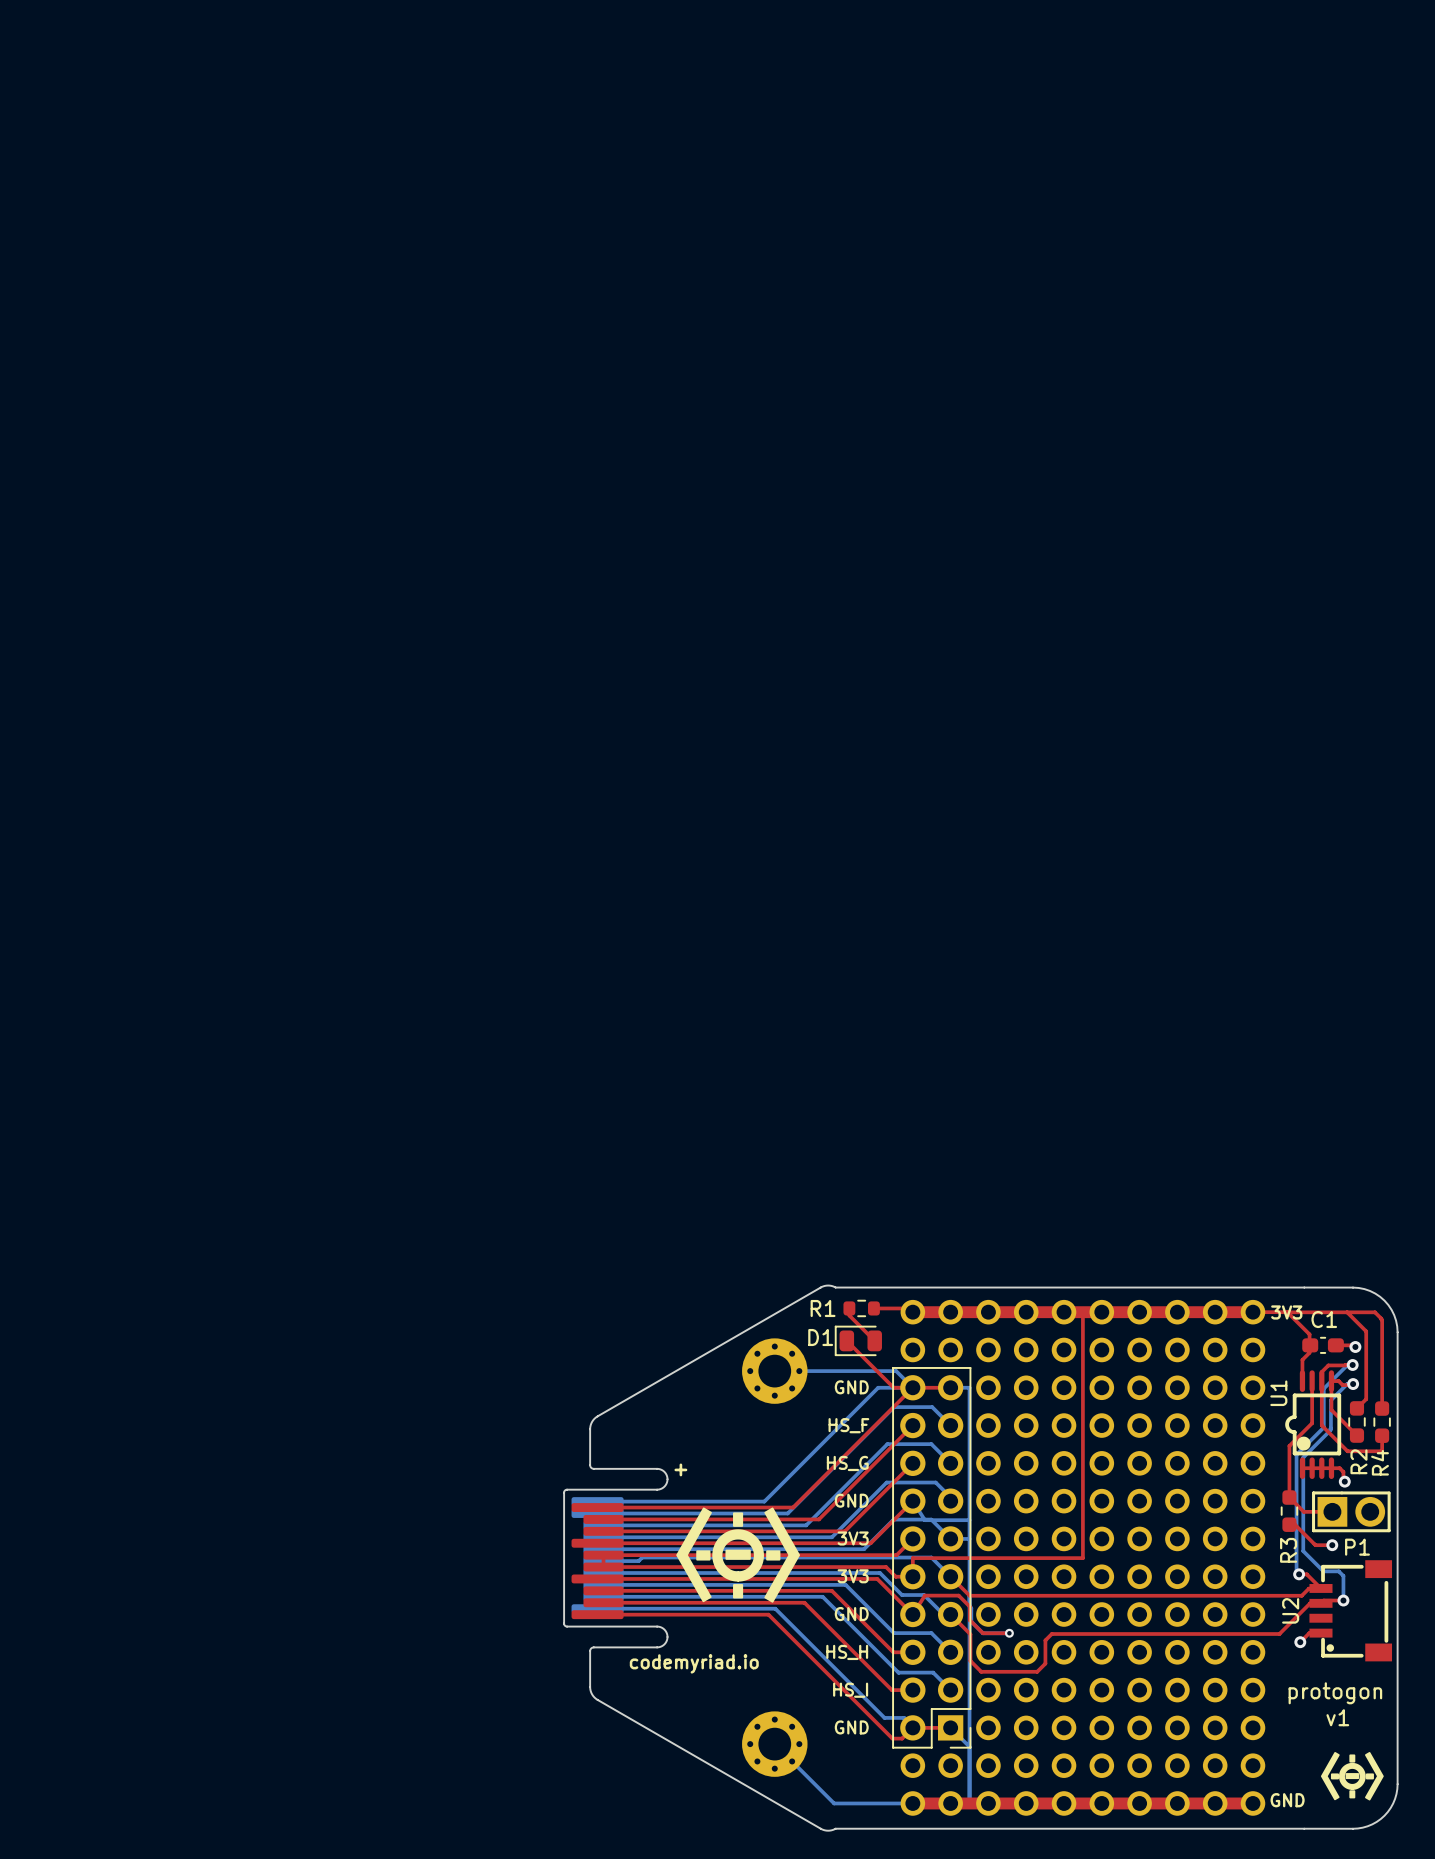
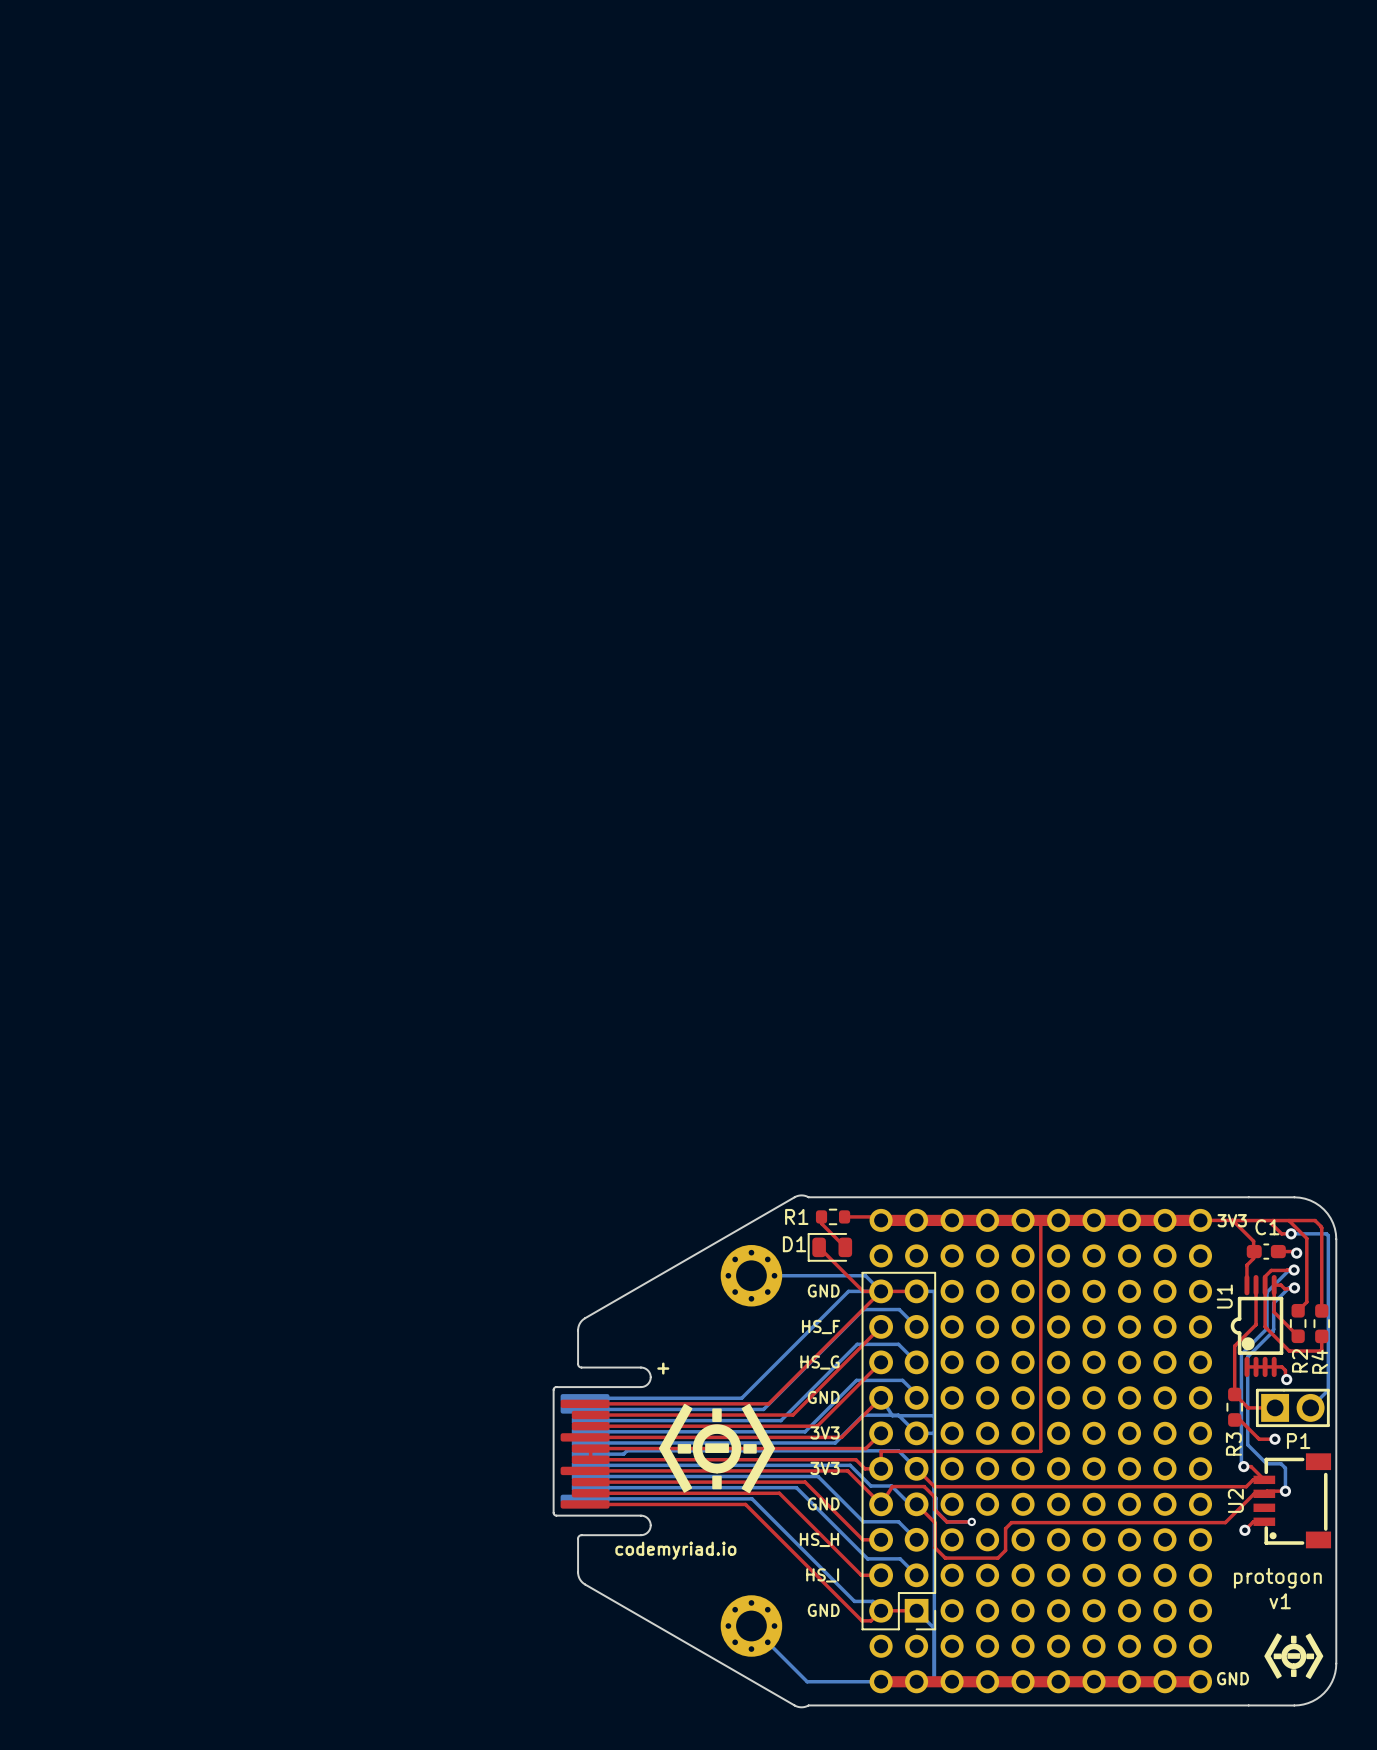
top track: none -> (1273, 1220) (1273, 1225) (1281, 1233) (1291, 1233)
bottom track: none -> (1291, 1233) (1326, 1233) (1328, 1235) (1328, 1390) (1310, 1407)
via: none -> (1291, 1233)

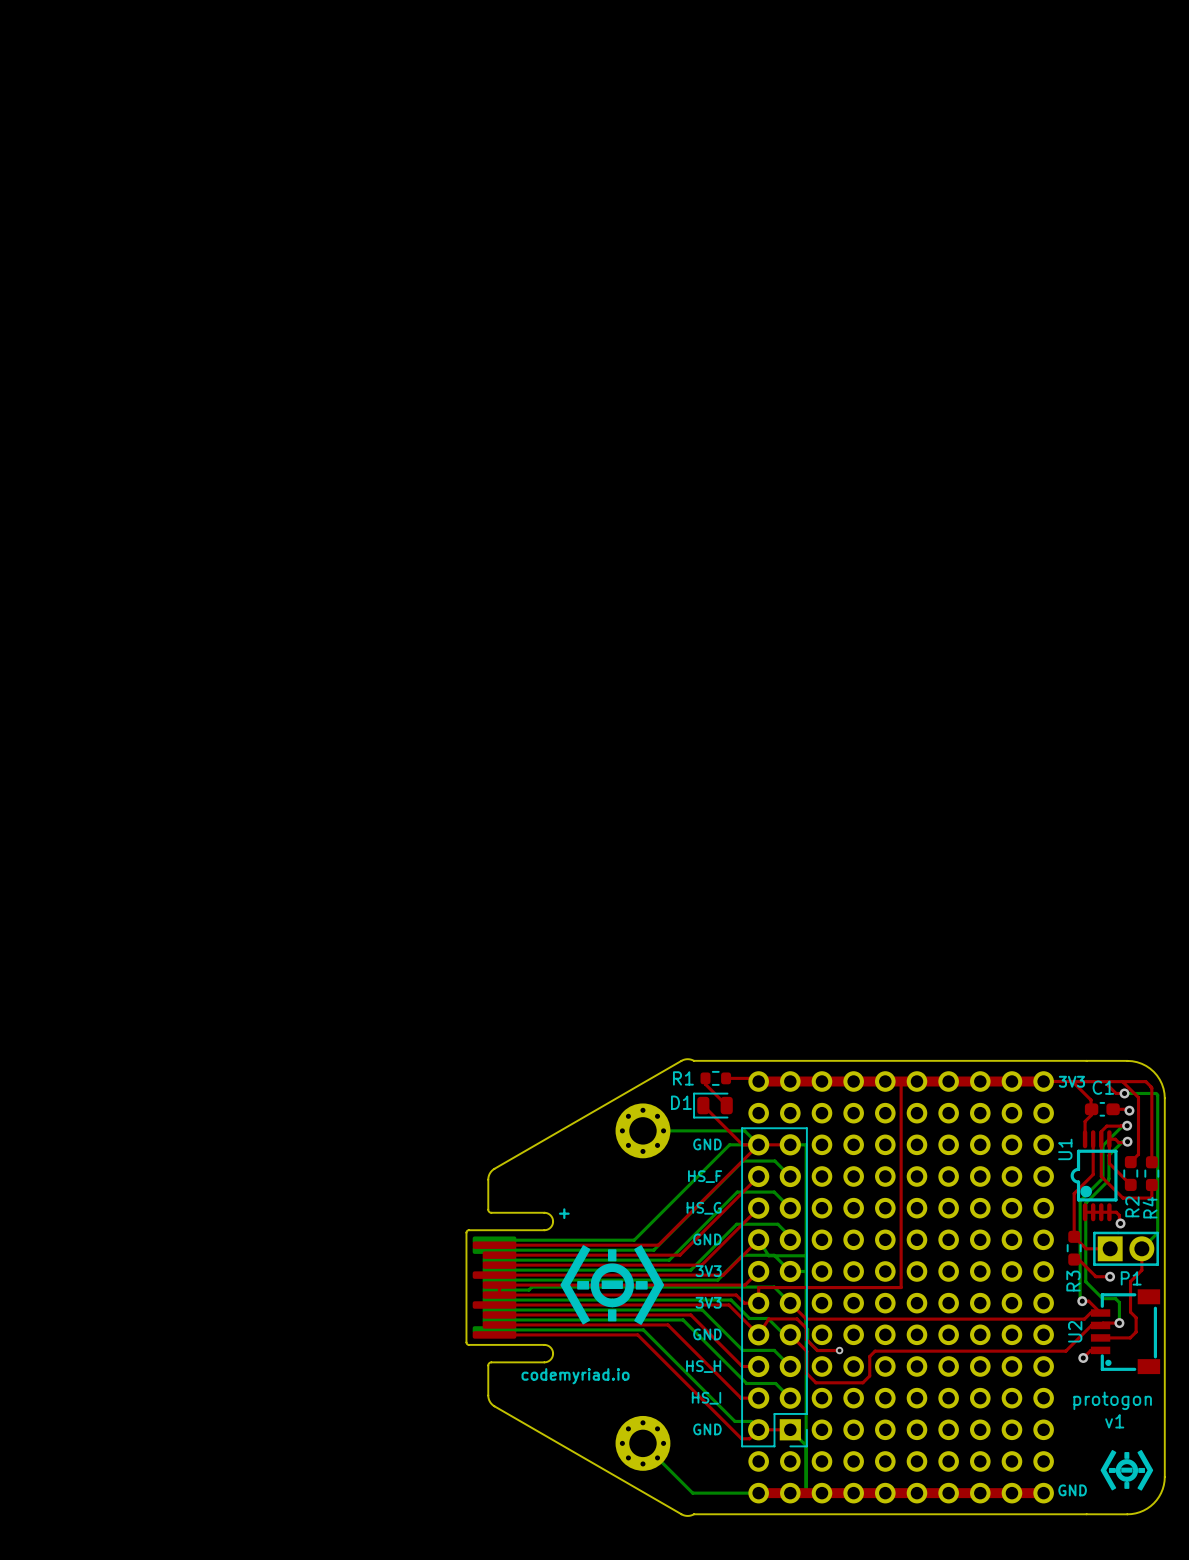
top track: none -> (1141, 1248) (1141, 1270) (1130, 1281) (1130, 1312) (1136, 1317) (1136, 1332) (1130, 1337) (1100, 1337)

